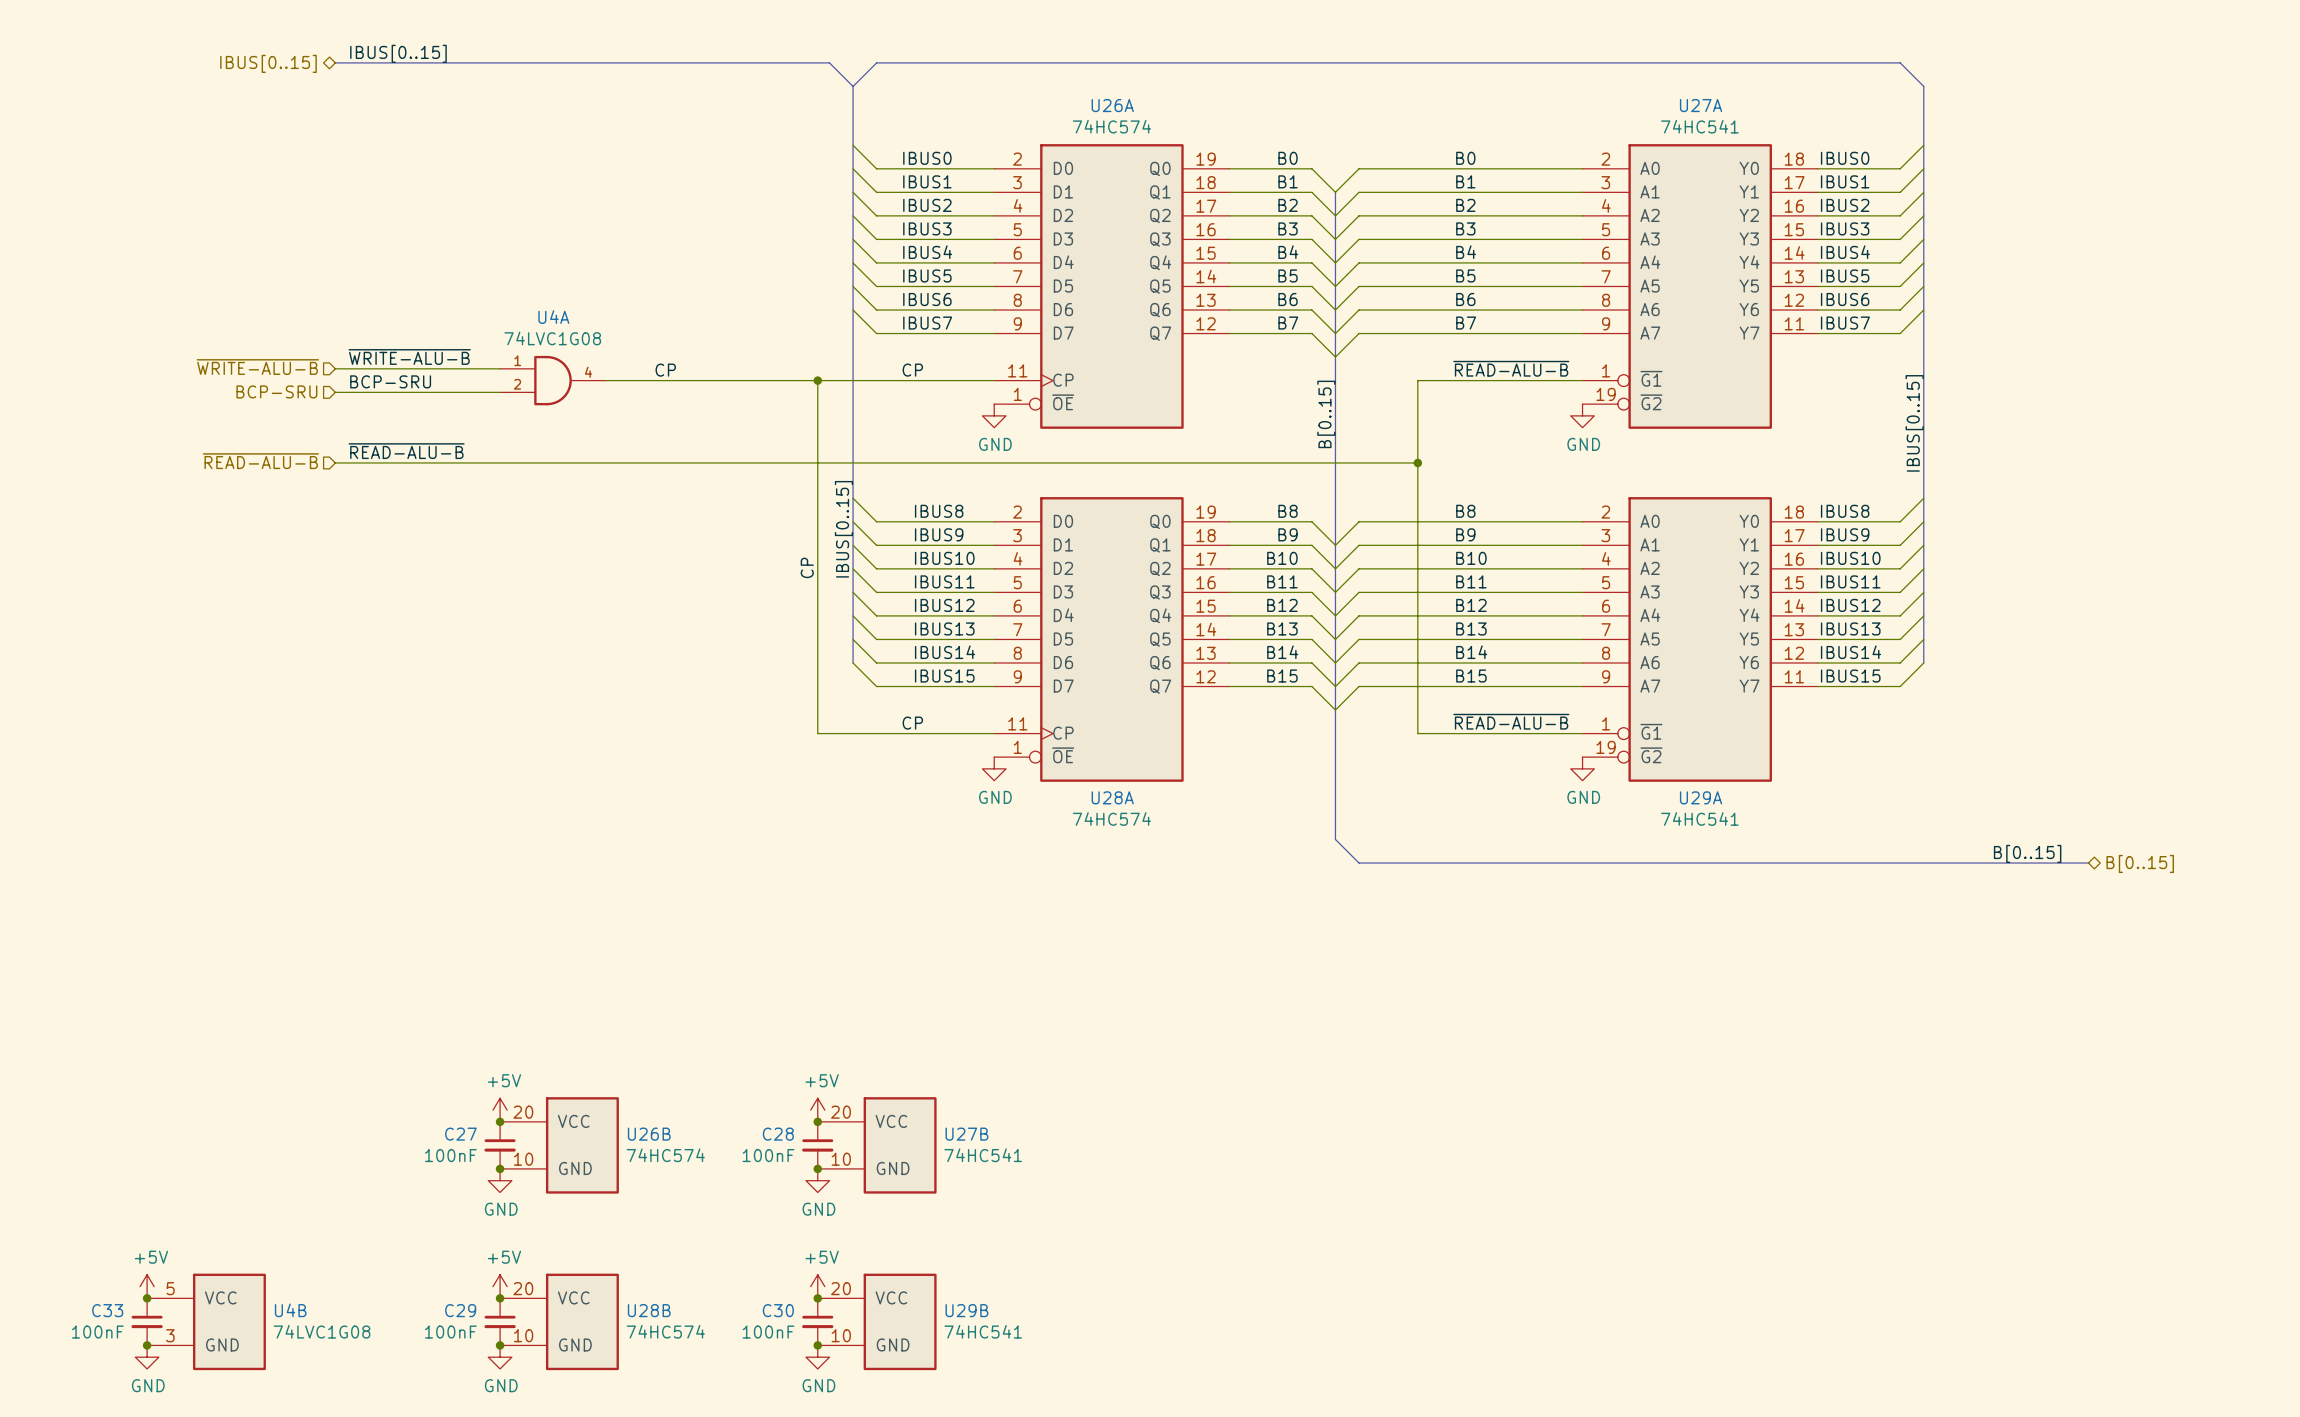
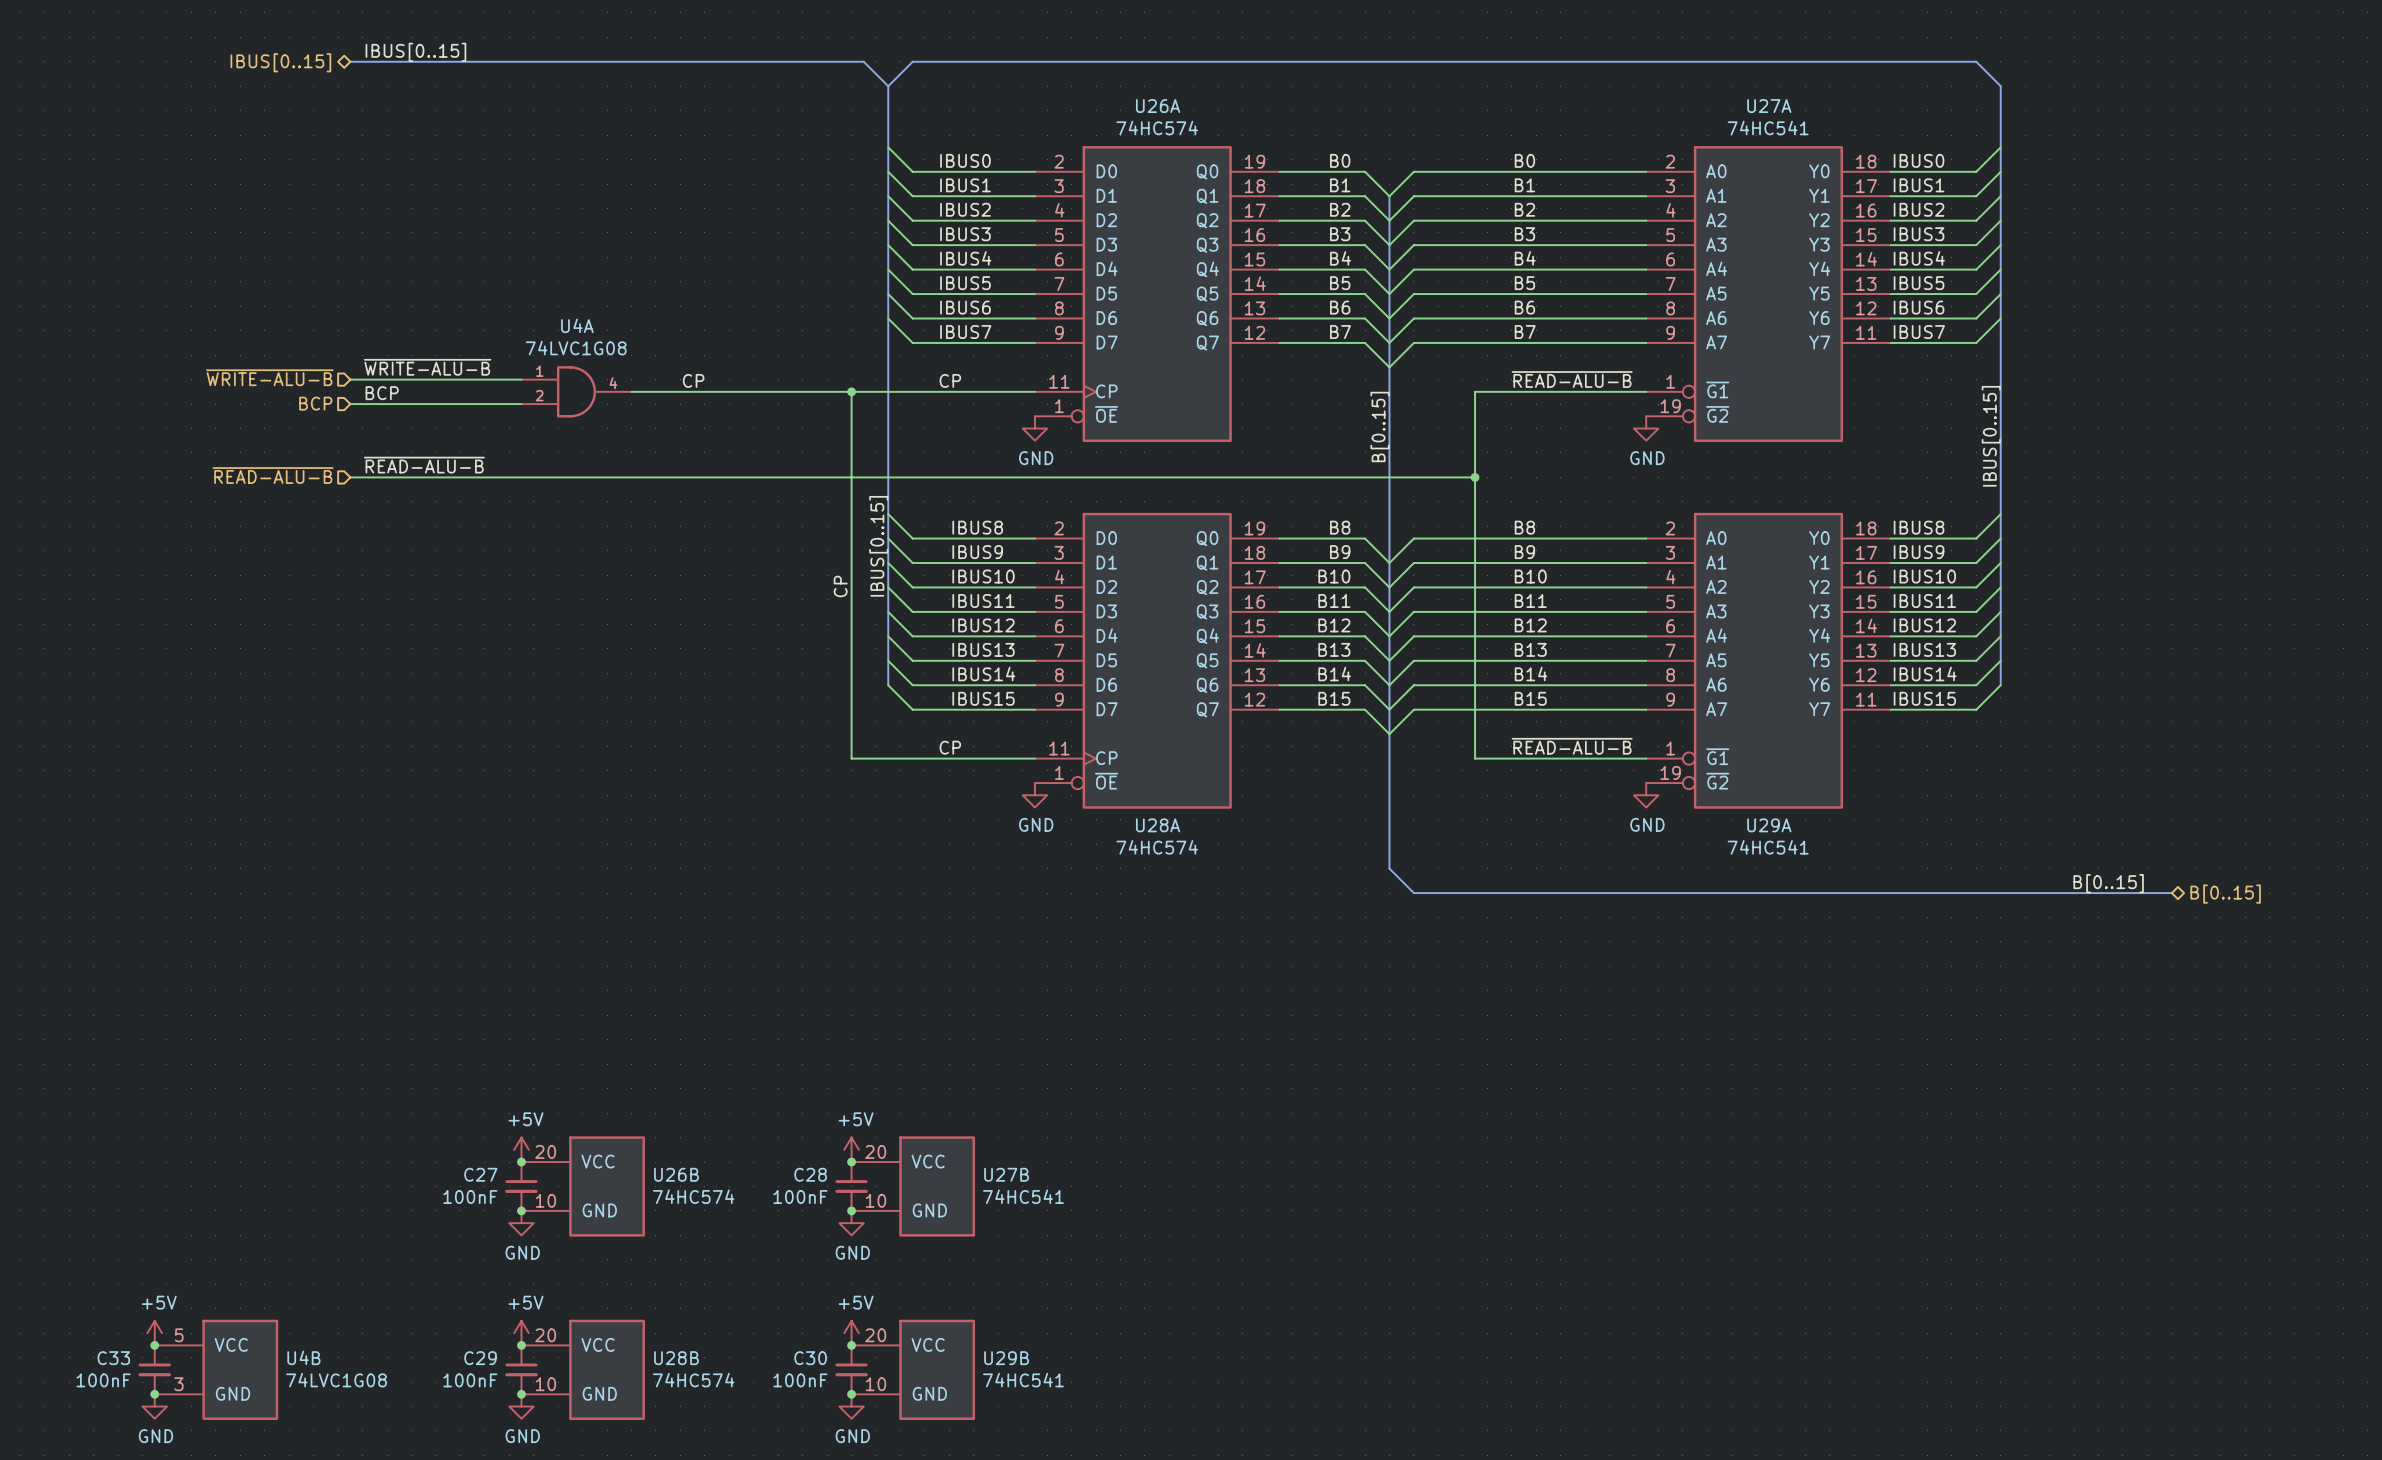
label: BCP-SRU (390, 381) -> BCP (382, 393)
hierarchical label: BCP-SRU (276, 391) -> BCP (315, 403)

